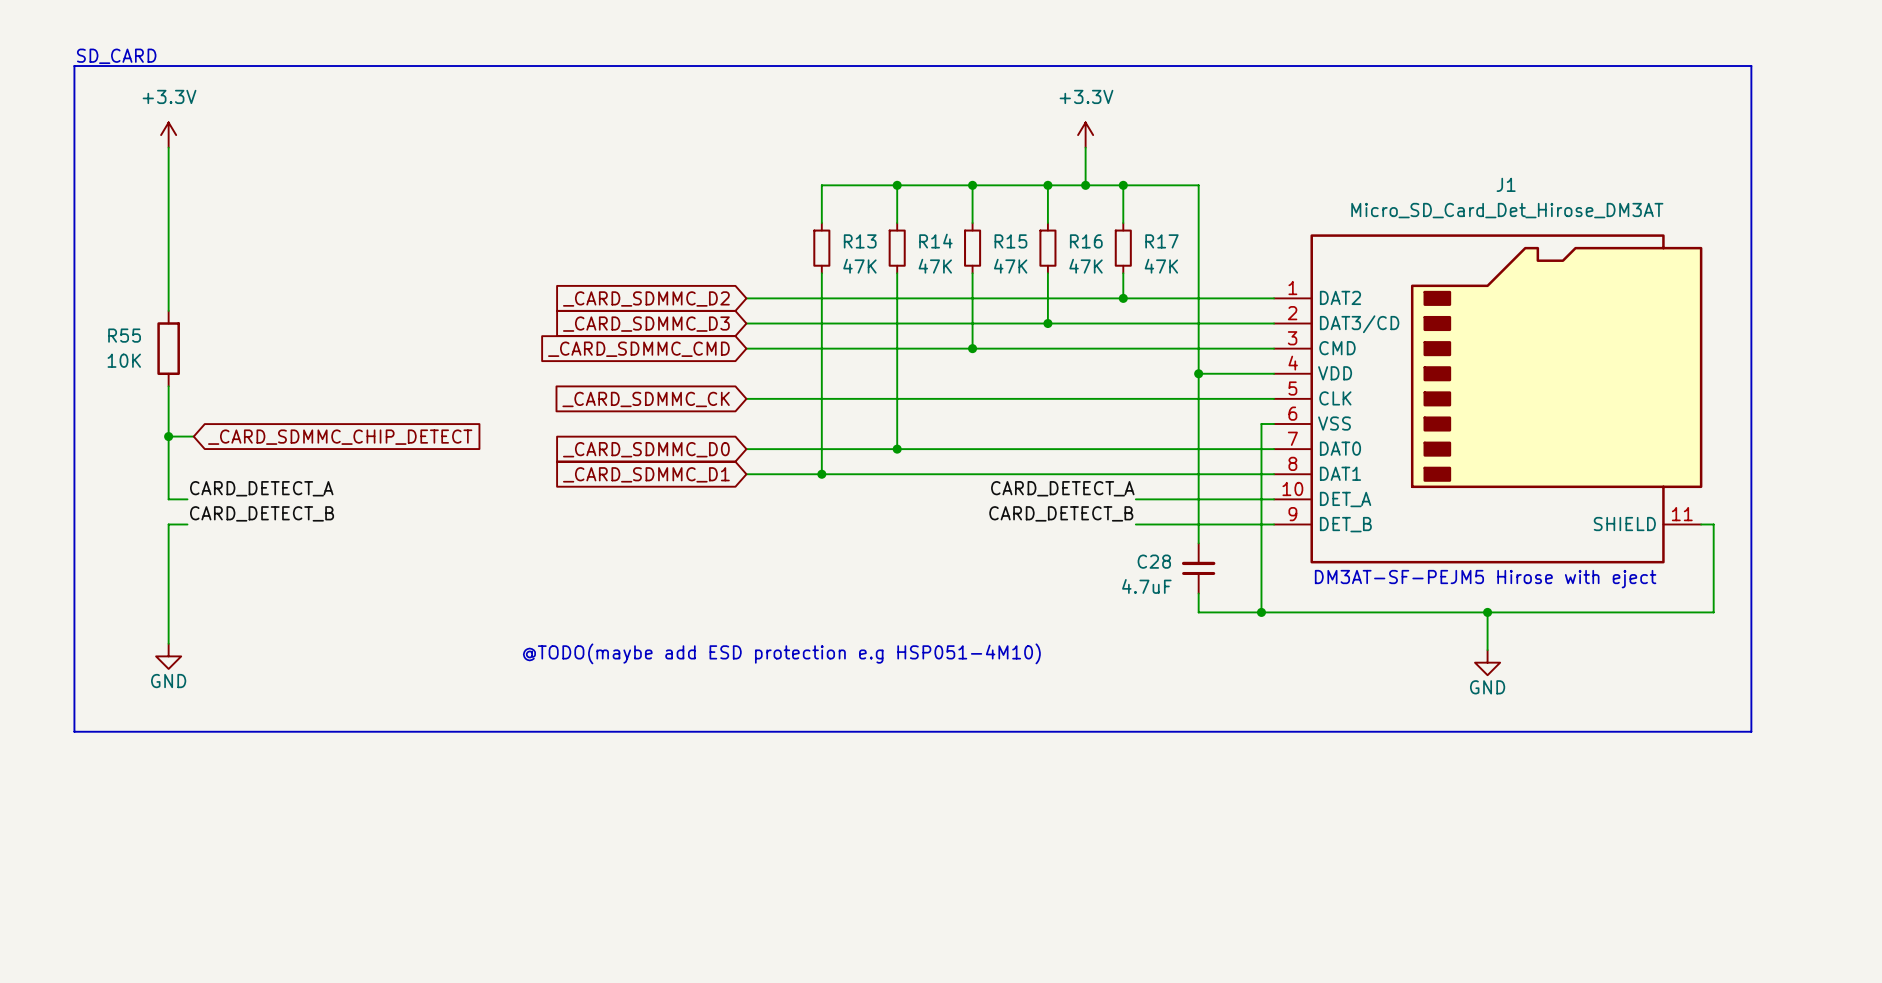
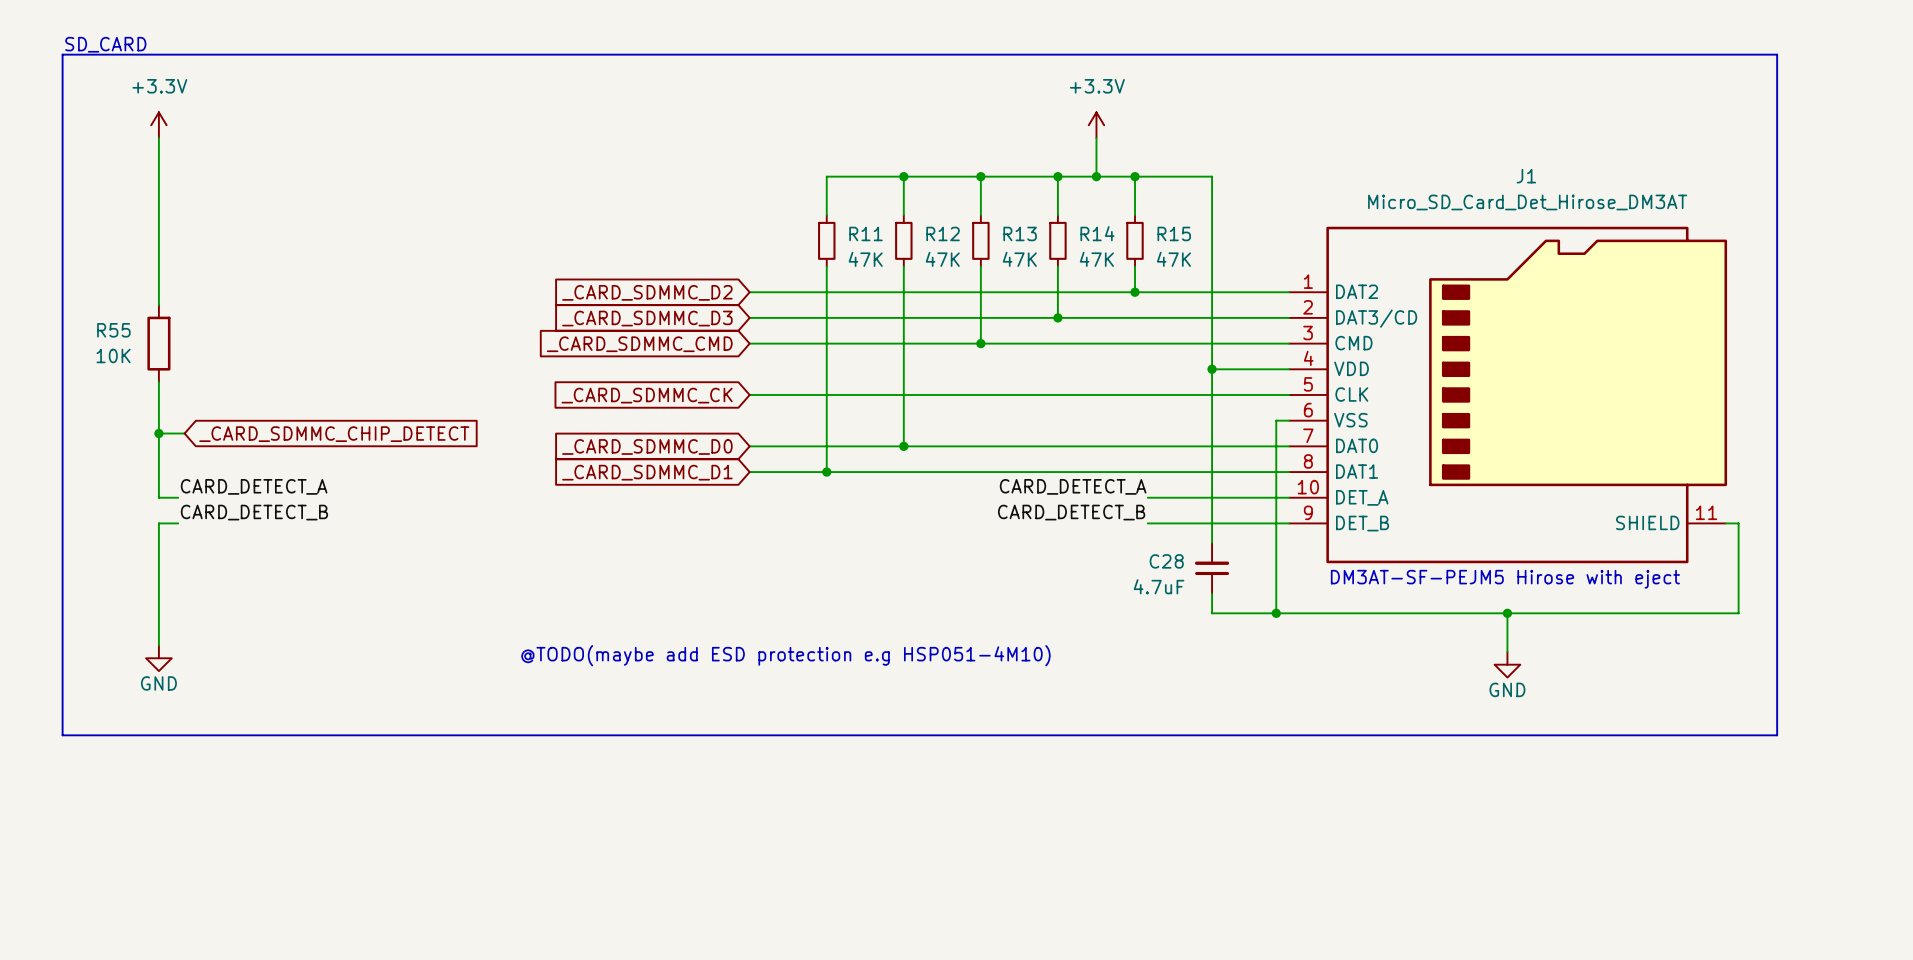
R13 name: R13 (860, 241) -> R11 (866, 233)
R14 name: R14 (935, 241) -> R12 (943, 233)
R15 name: R15 (1010, 241) -> R13 (1020, 233)
R16 name: R16 (1086, 241) -> R14 (1097, 233)
R17 name: R17 (1161, 241) -> R15 (1174, 233)

